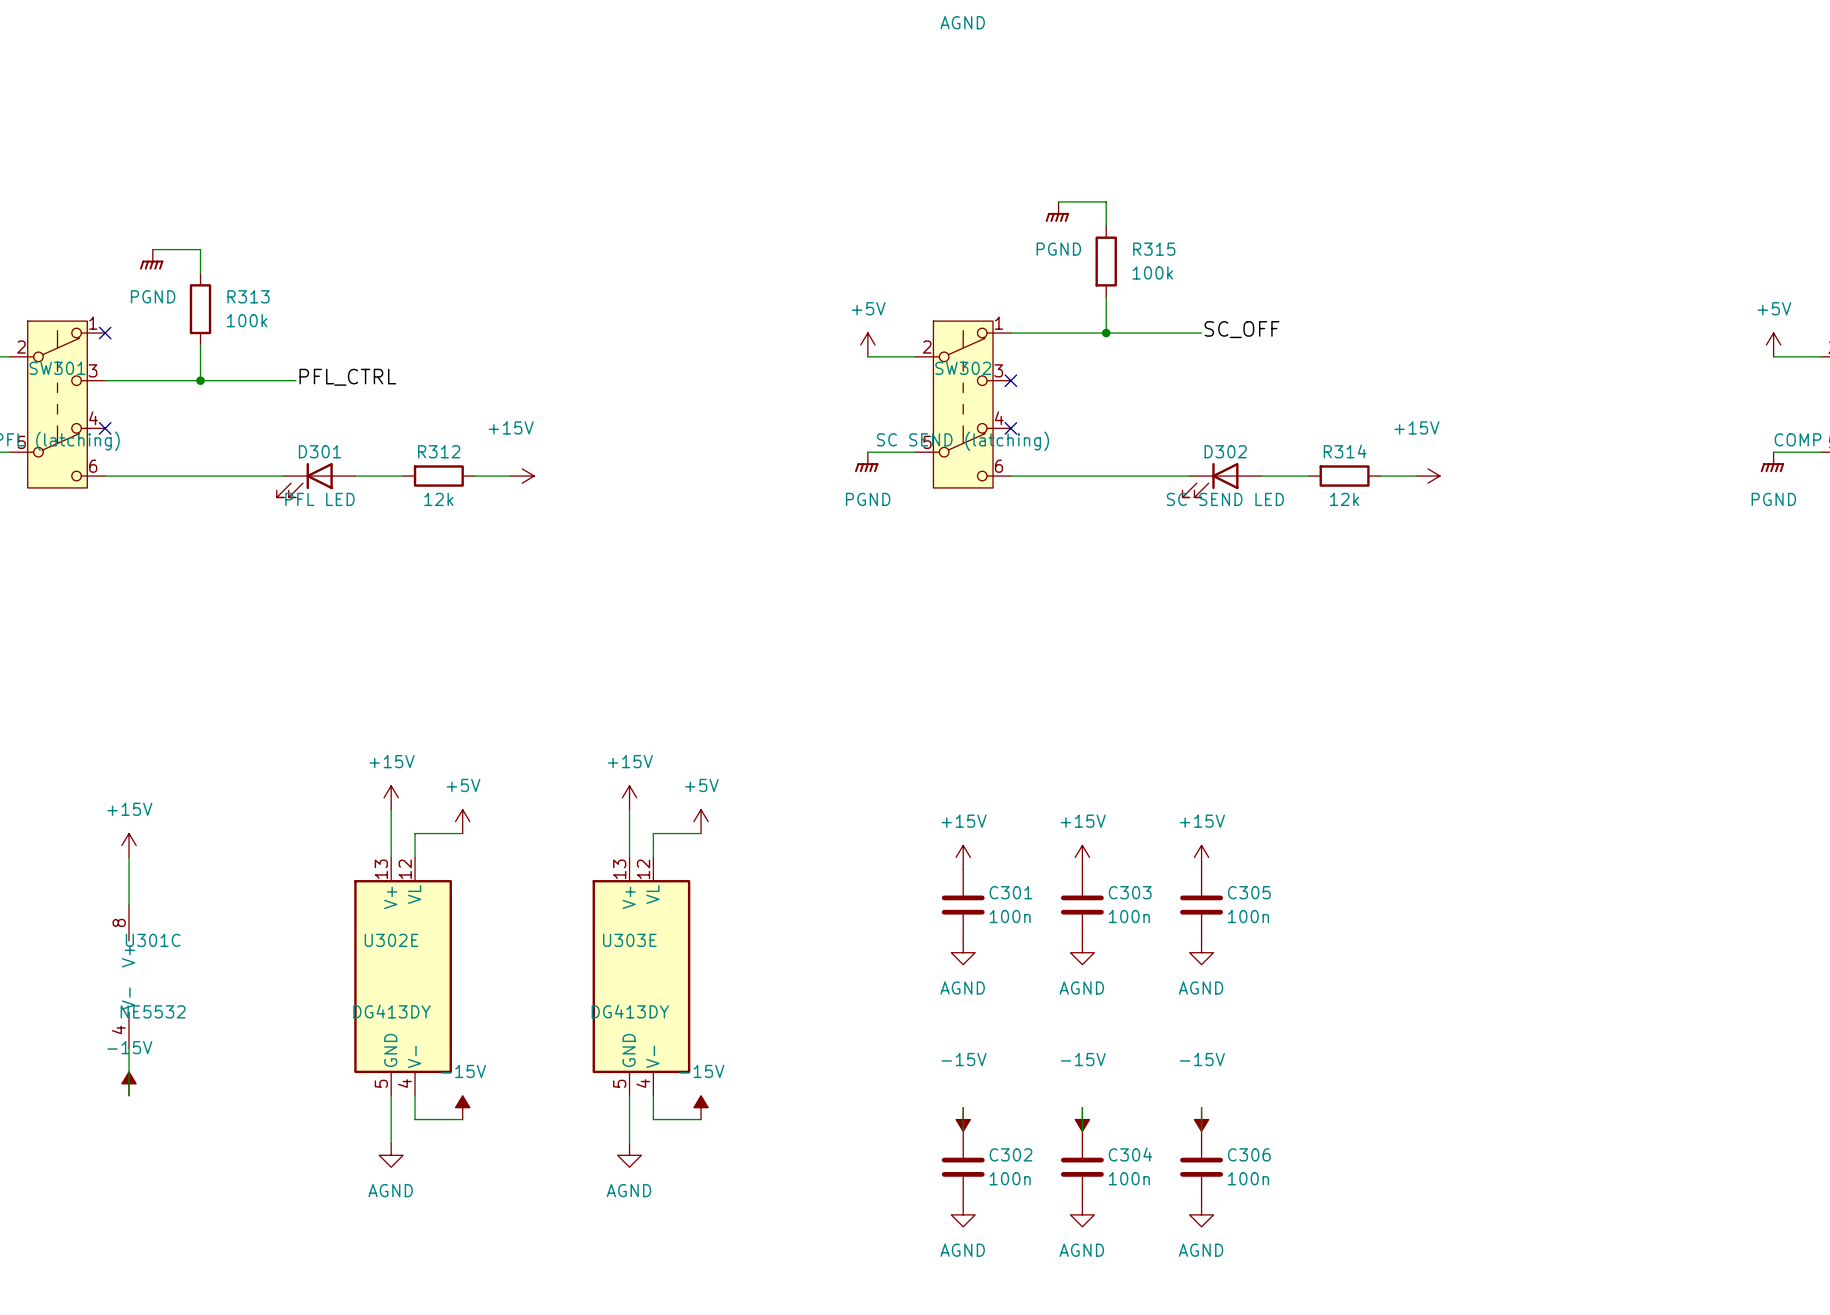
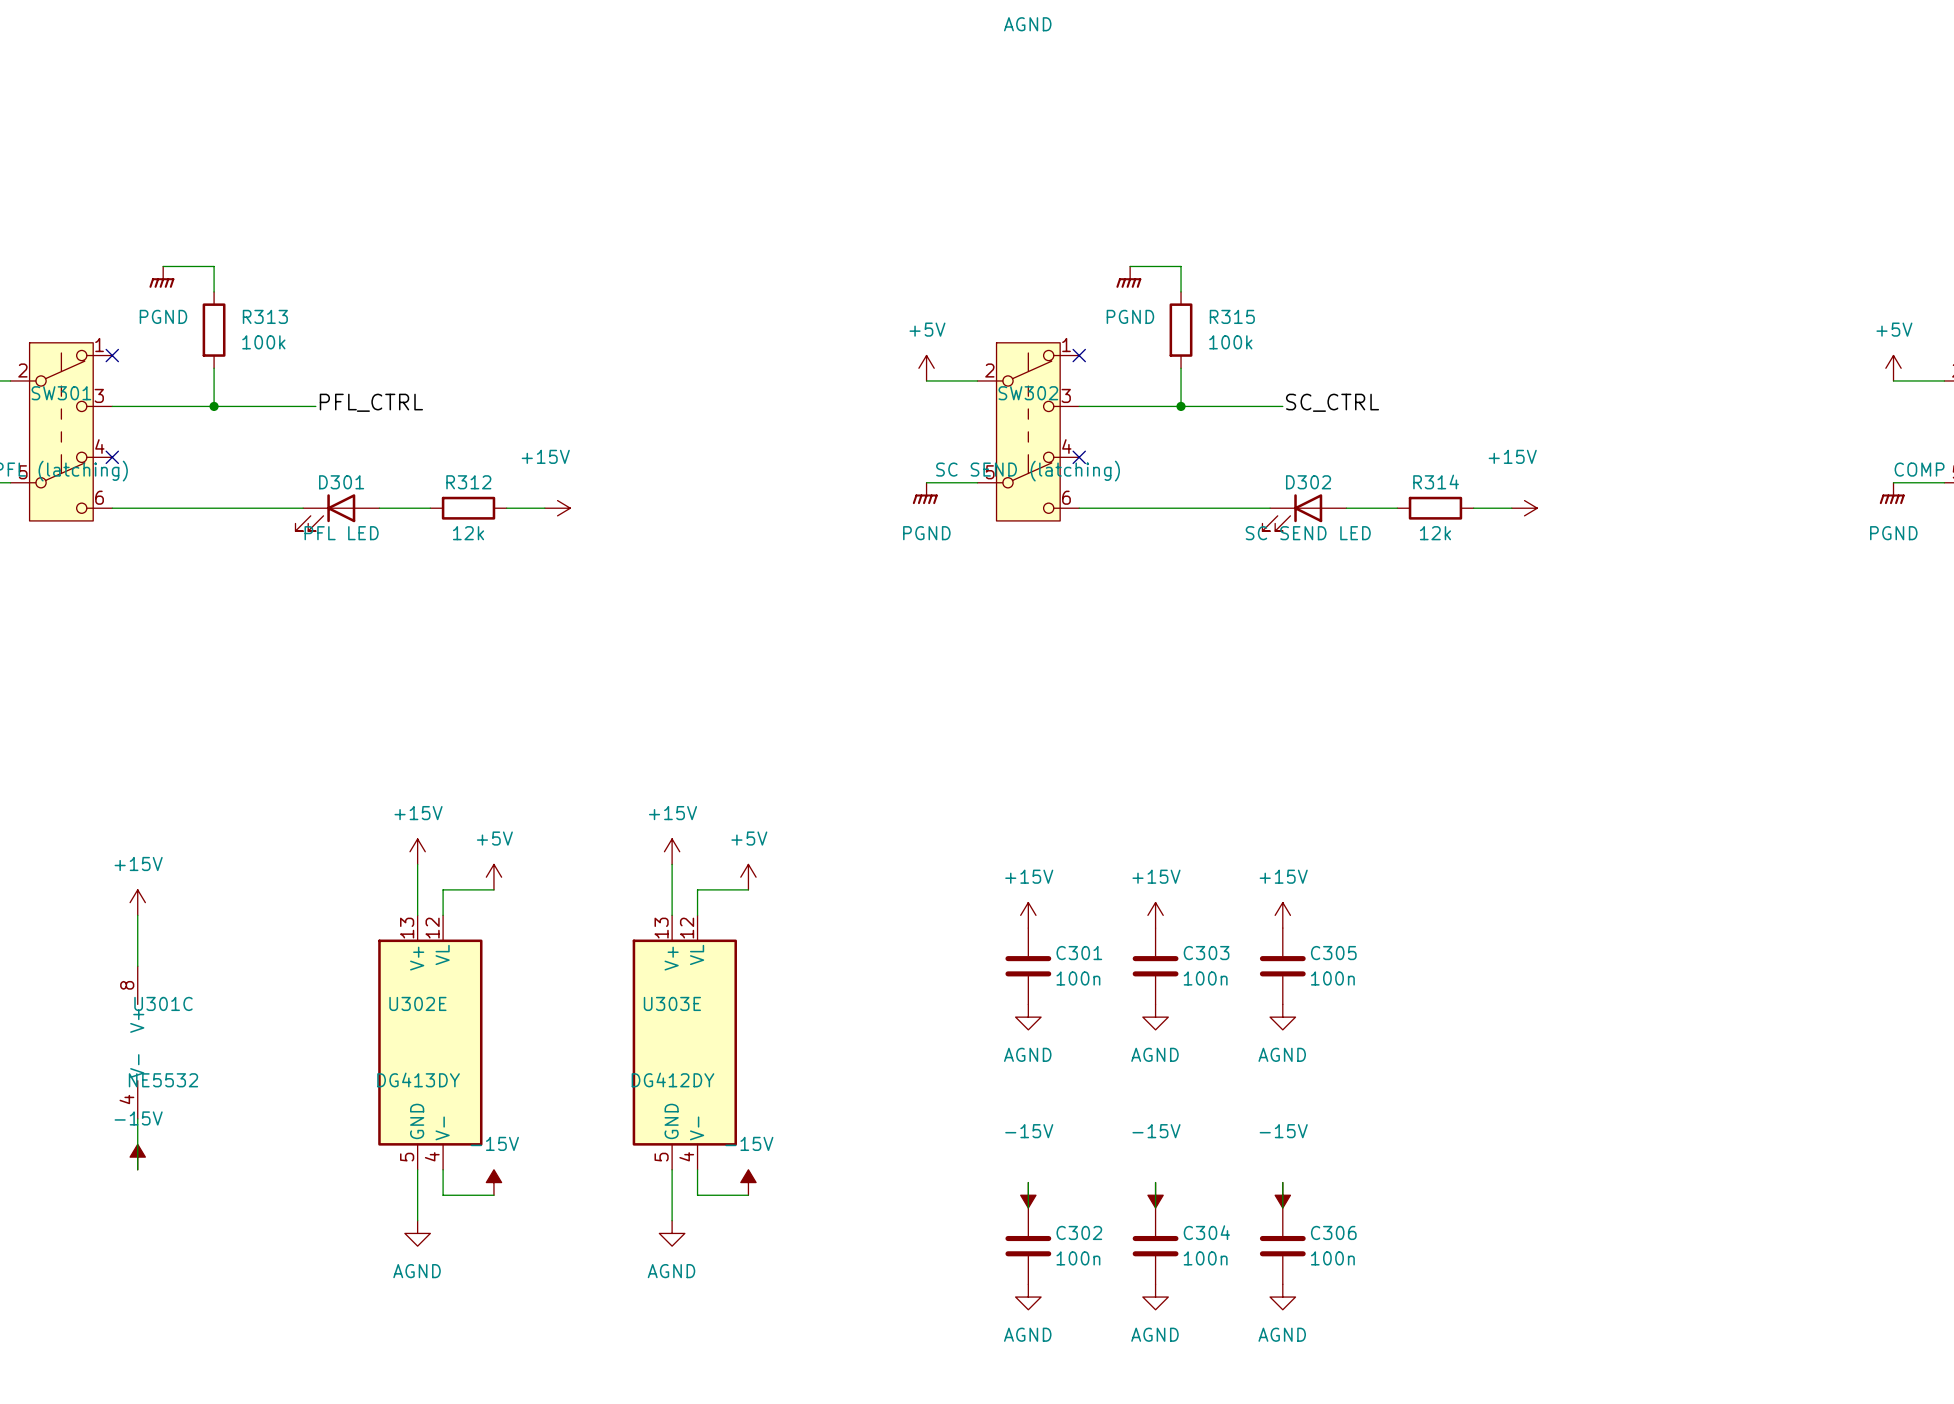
wire: (1058, 201) (1106, 201) (1106, 225) -> (1130, 266) (1181, 266) (1181, 291)
power symbol position: PGND (1057, 211) -> PGND (1128, 277)
R315 position: (1106, 261) -> (1181, 330)
wire: (1106, 297) (1106, 333) -> (1181, 368) (1181, 406)
label: SC_OFF (1242, 329) -> none
wire: (1010, 333) (1201, 333) -> (1079, 406) (1282, 406)
junction position: (1106, 333) -> (1181, 406)
label: none -> SC_CTRL (1332, 402)
no-connect mark position: (1010, 380) -> (1079, 355)
U303E value: DG413DY (630, 1011) -> DG412DY (673, 1079)

